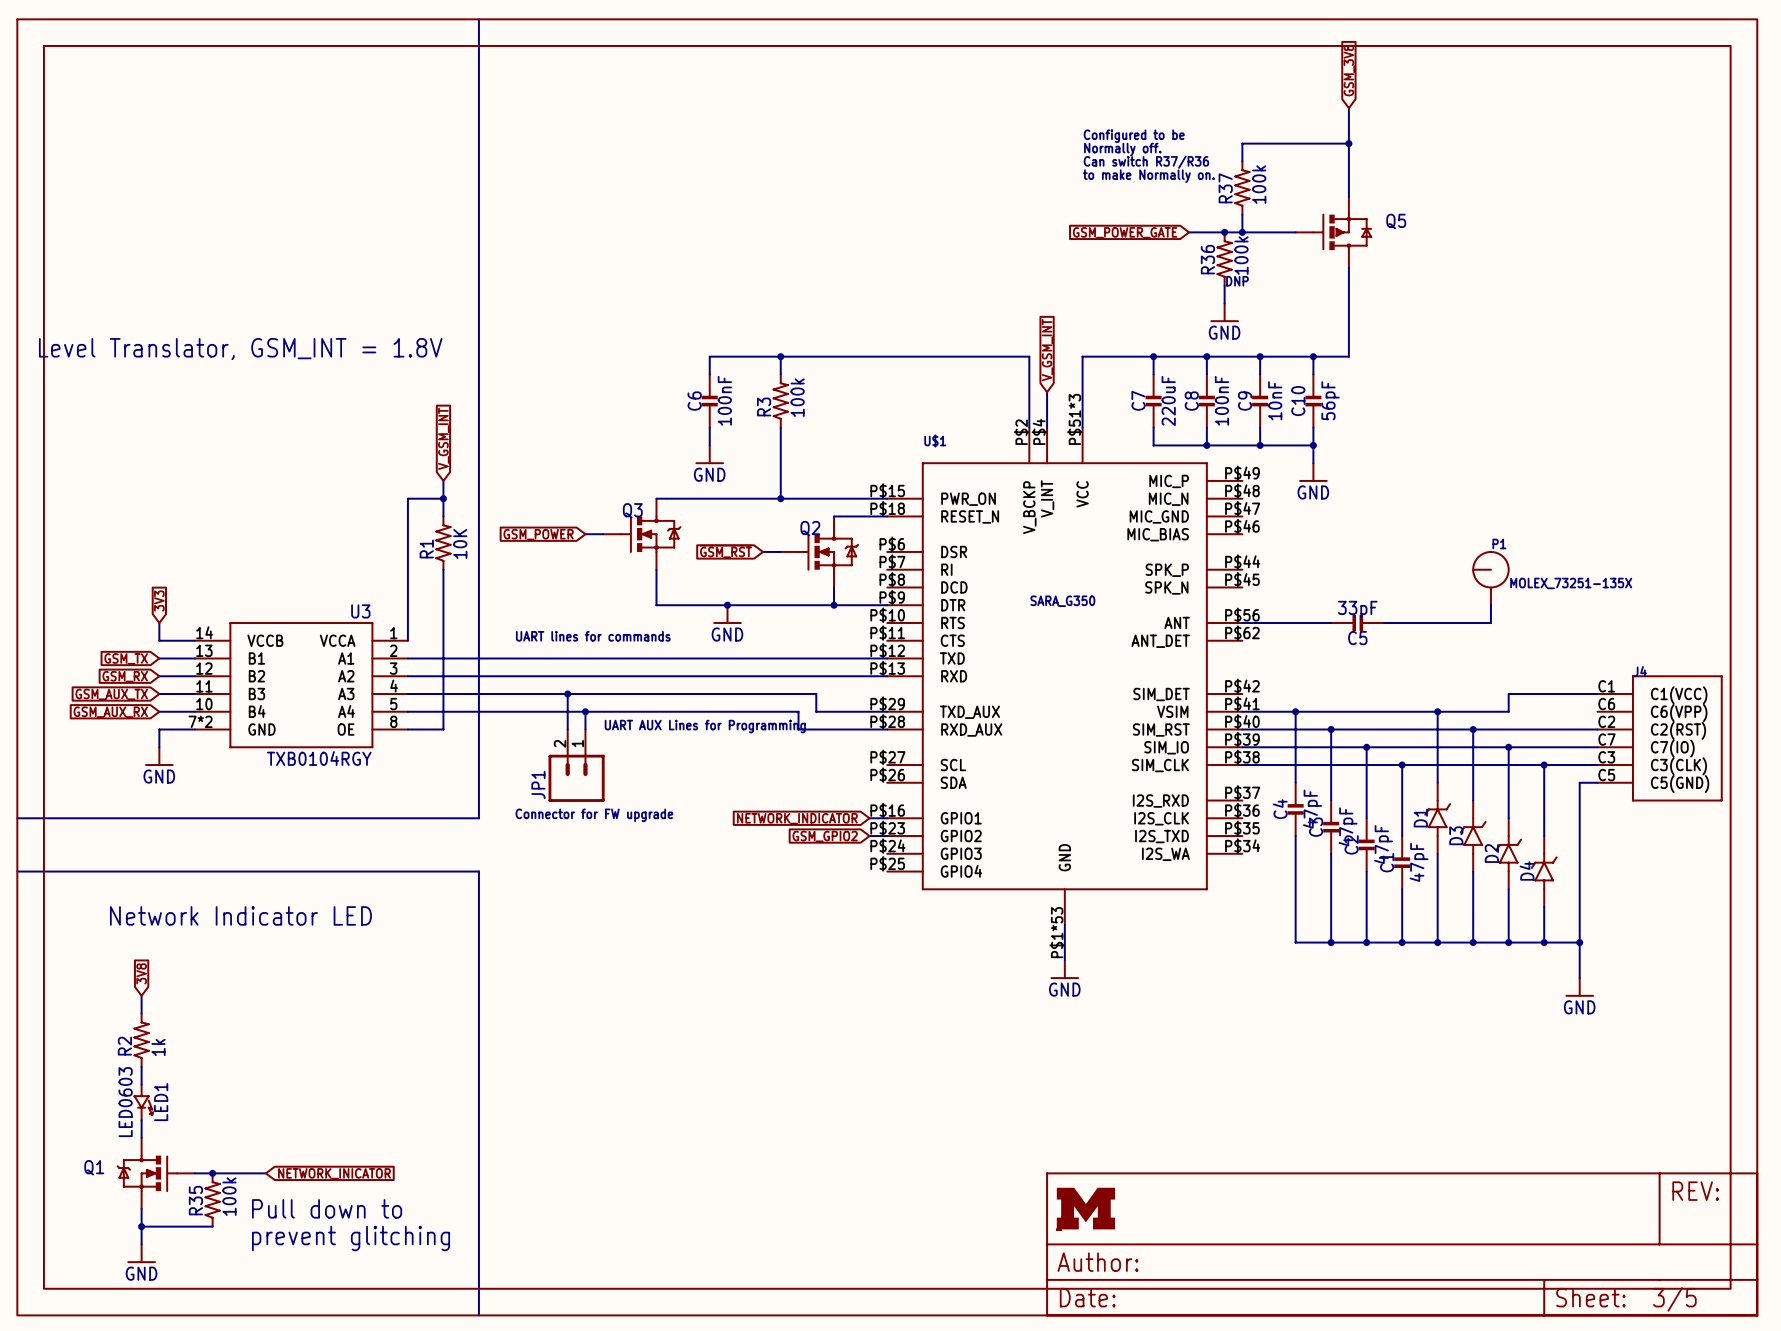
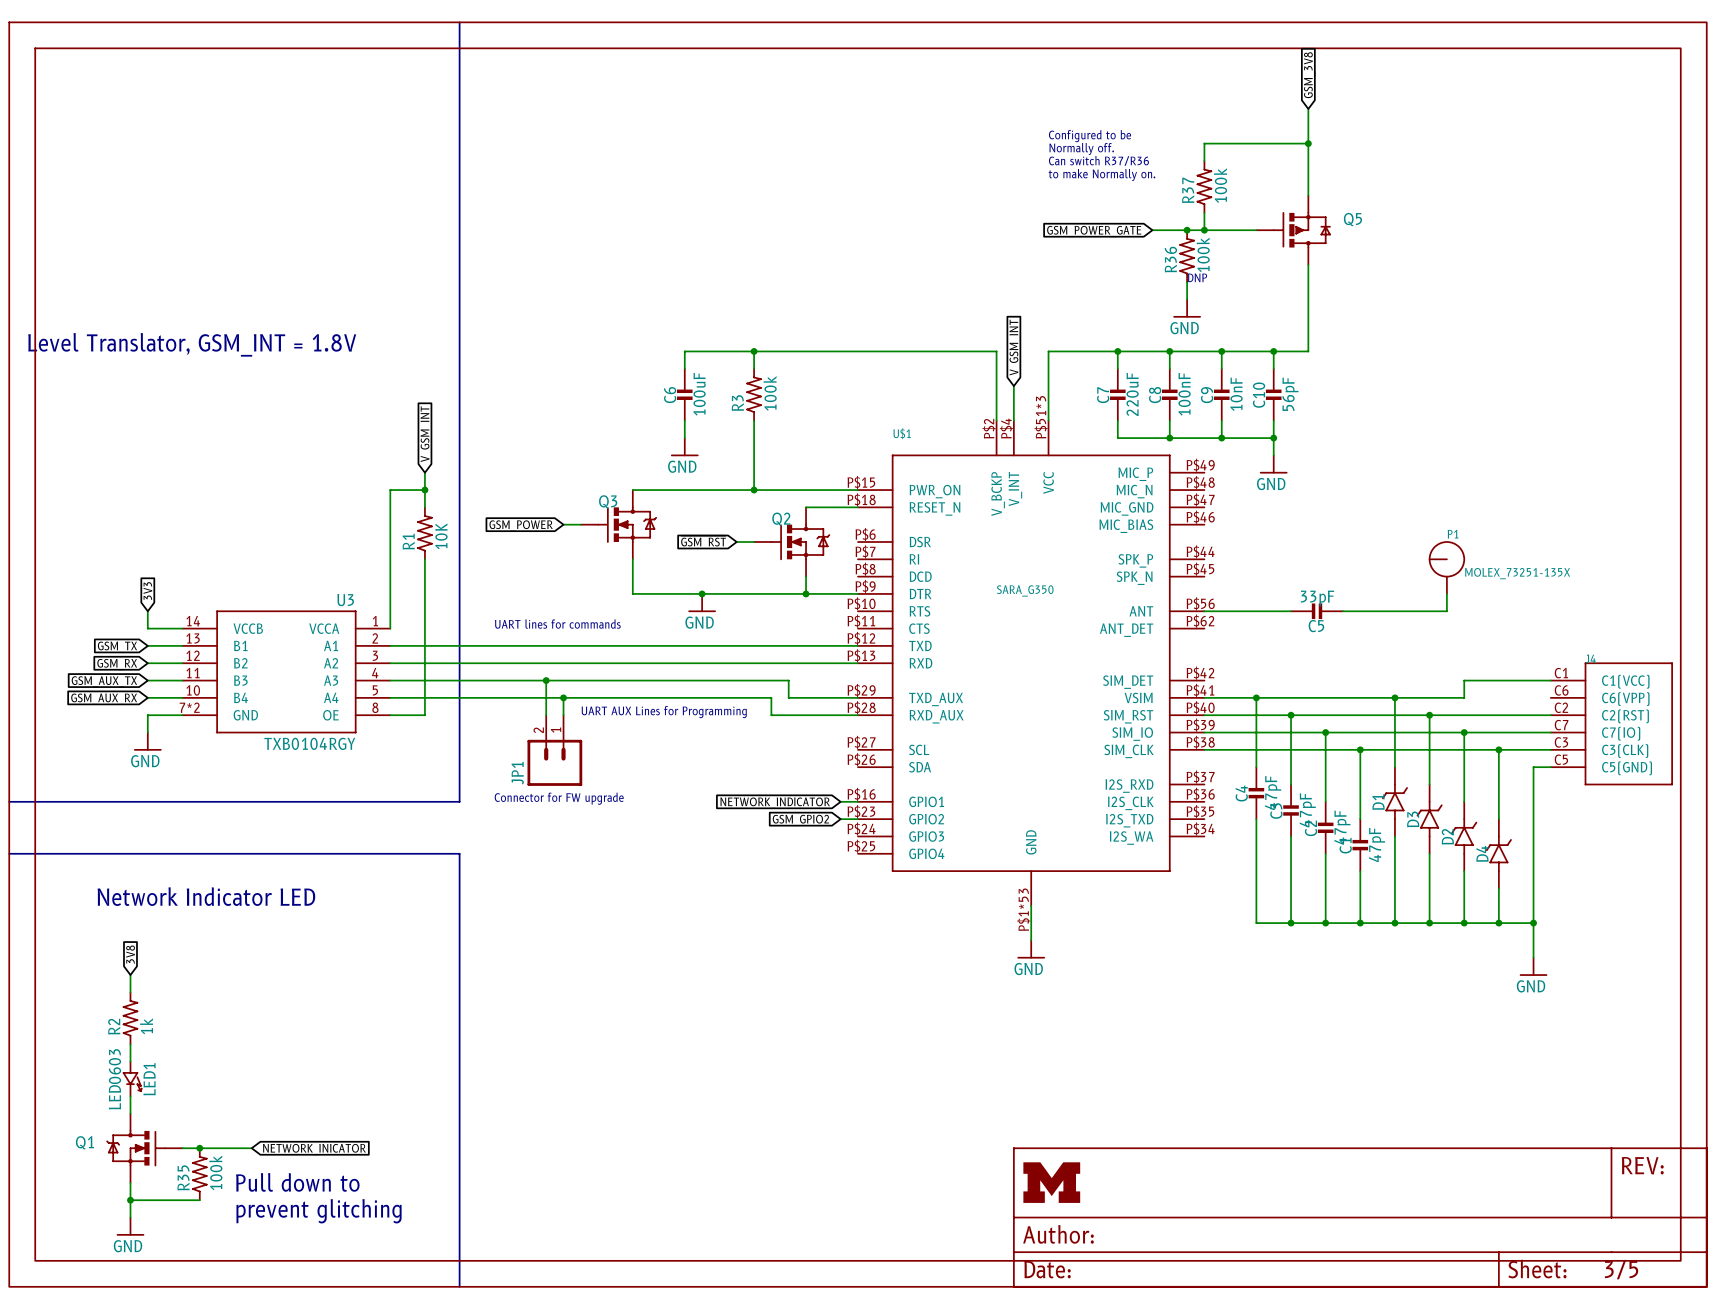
C6 value: 100nF (724, 400) -> 100uF (699, 394)

